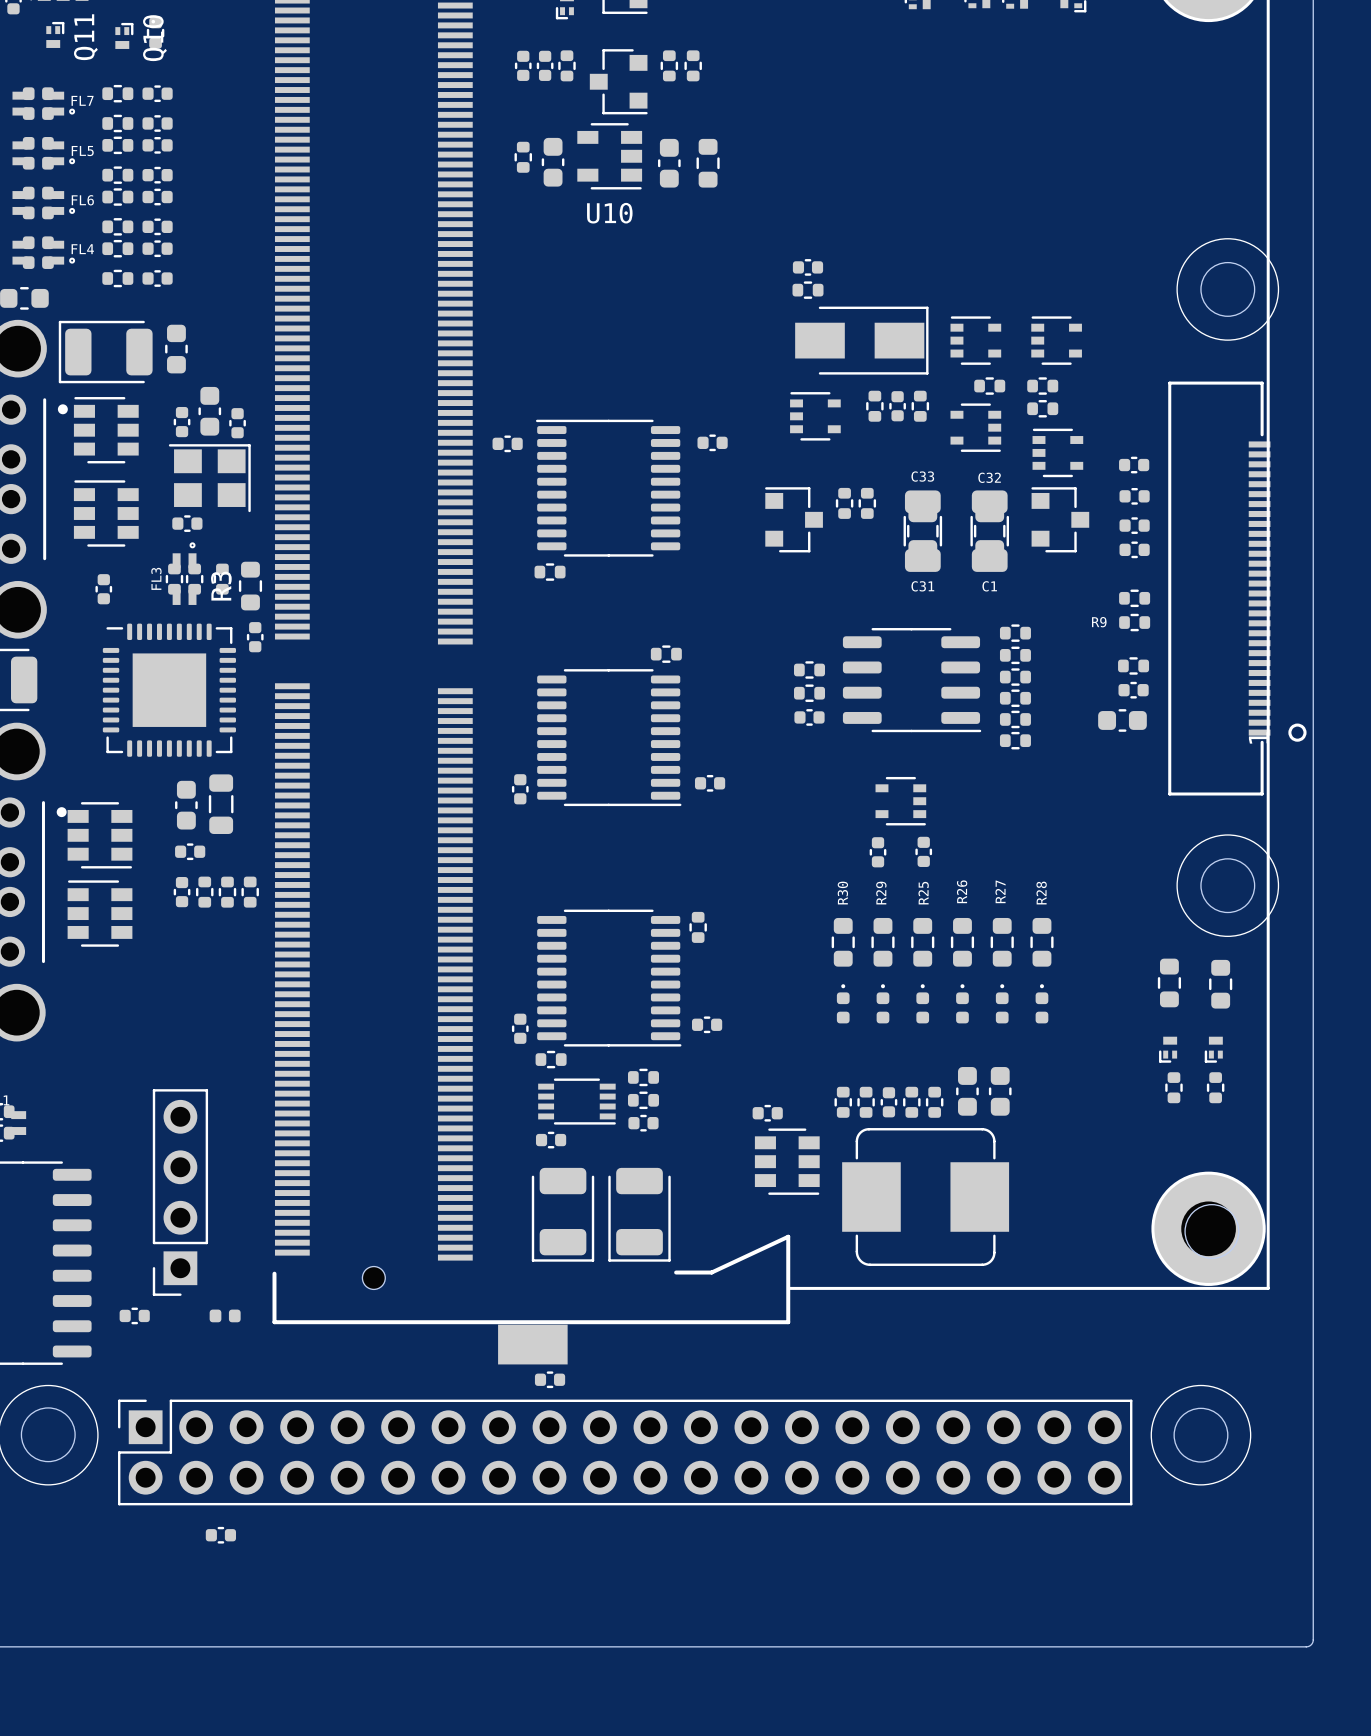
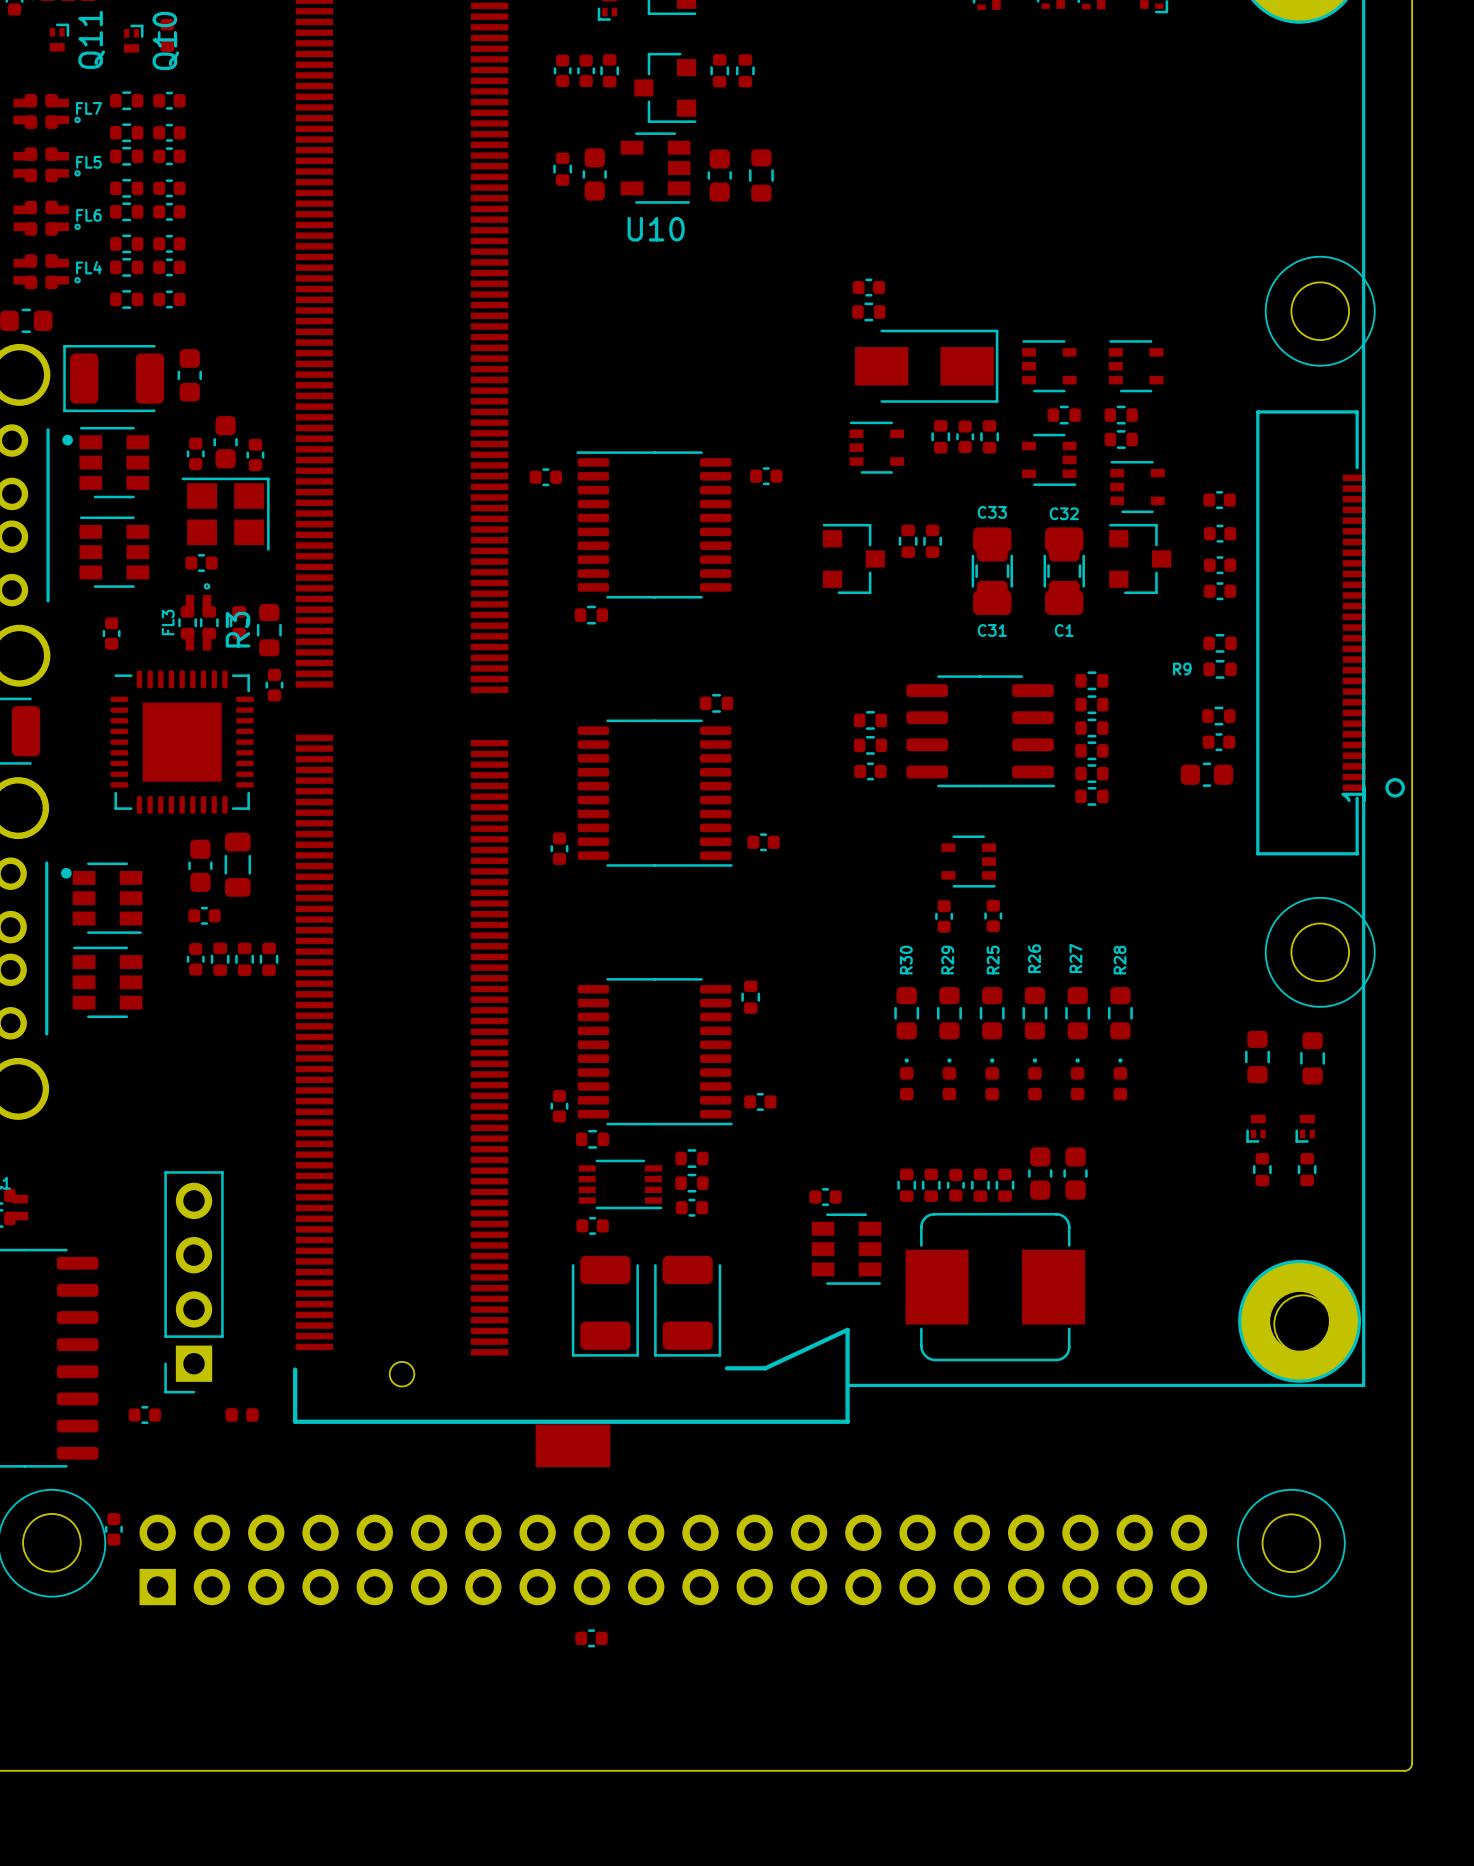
part position: (550, 1379) -> (591, 1638)
part side: top (625, 1452) -> bottom (673, 1559)
part rotation: 0° (220, 1535) -> 90° clockwise (113, 1529)
part position: (220, 1535) -> (113, 1529)

